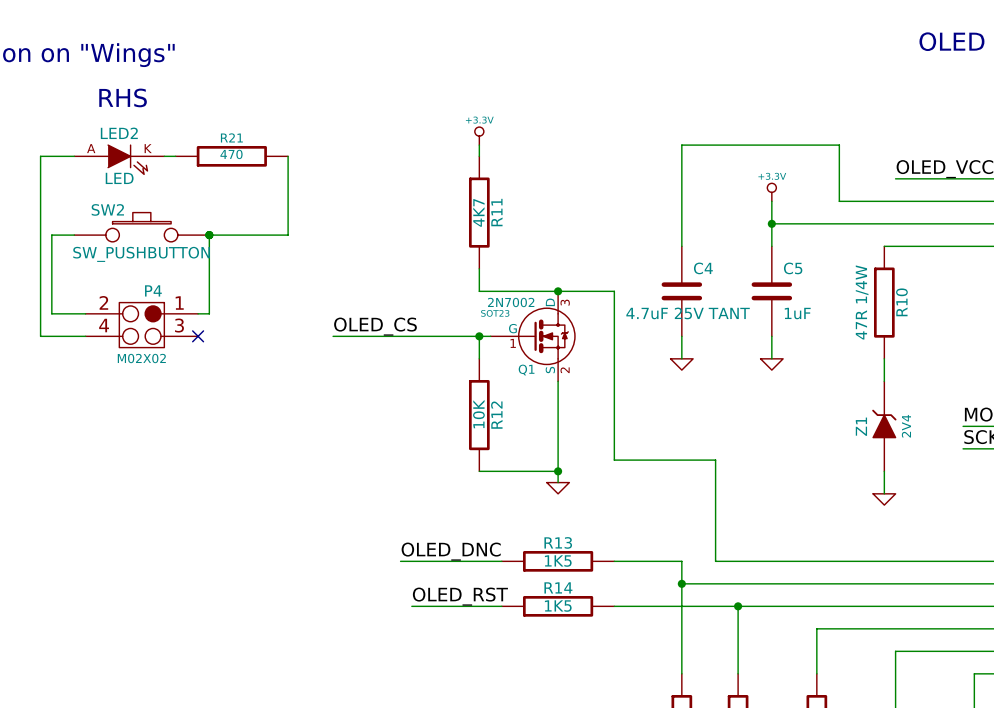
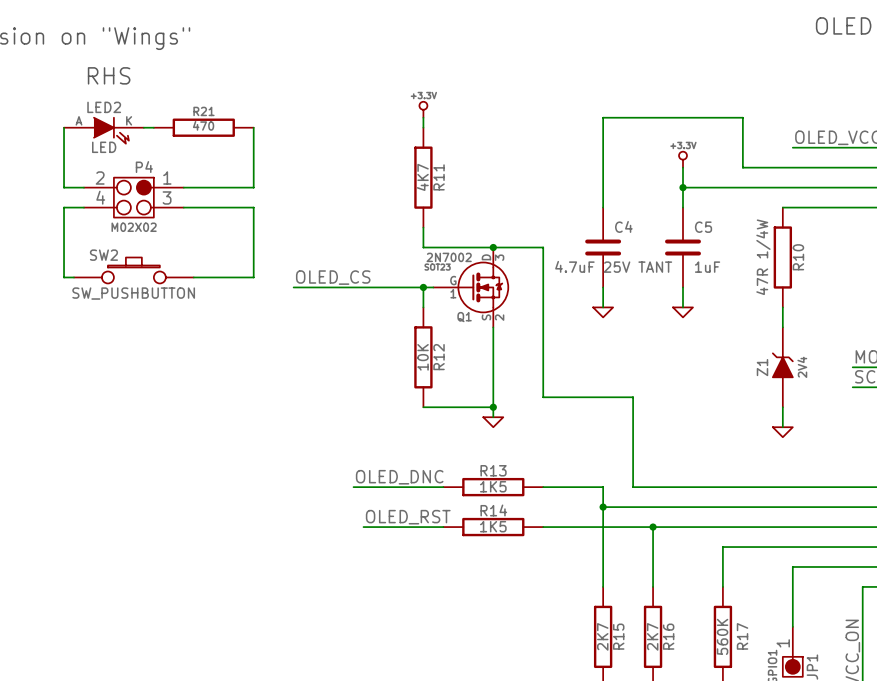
wire: (74, 156) (40, 156) (40, 336) (85, 336) -> (64, 127) (64, 187) (83, 187)
wire: (288, 223) (288, 235) (209, 235) (209, 313) (198, 313) -> (253, 187) (183, 187)
SW2 position: (141, 227) -> (133, 270)
wire: (74, 235) (51, 235) (51, 313) (85, 313) -> none
junction: (209, 235) -> none
wire: none -> (83, 207) (64, 207) (64, 277) (74, 277)
wire: none -> (183, 207) (253, 207) (253, 277) (193, 277)
P4 position: (141, 325) -> (133, 197)
no-connect mark: (198, 336) -> none

